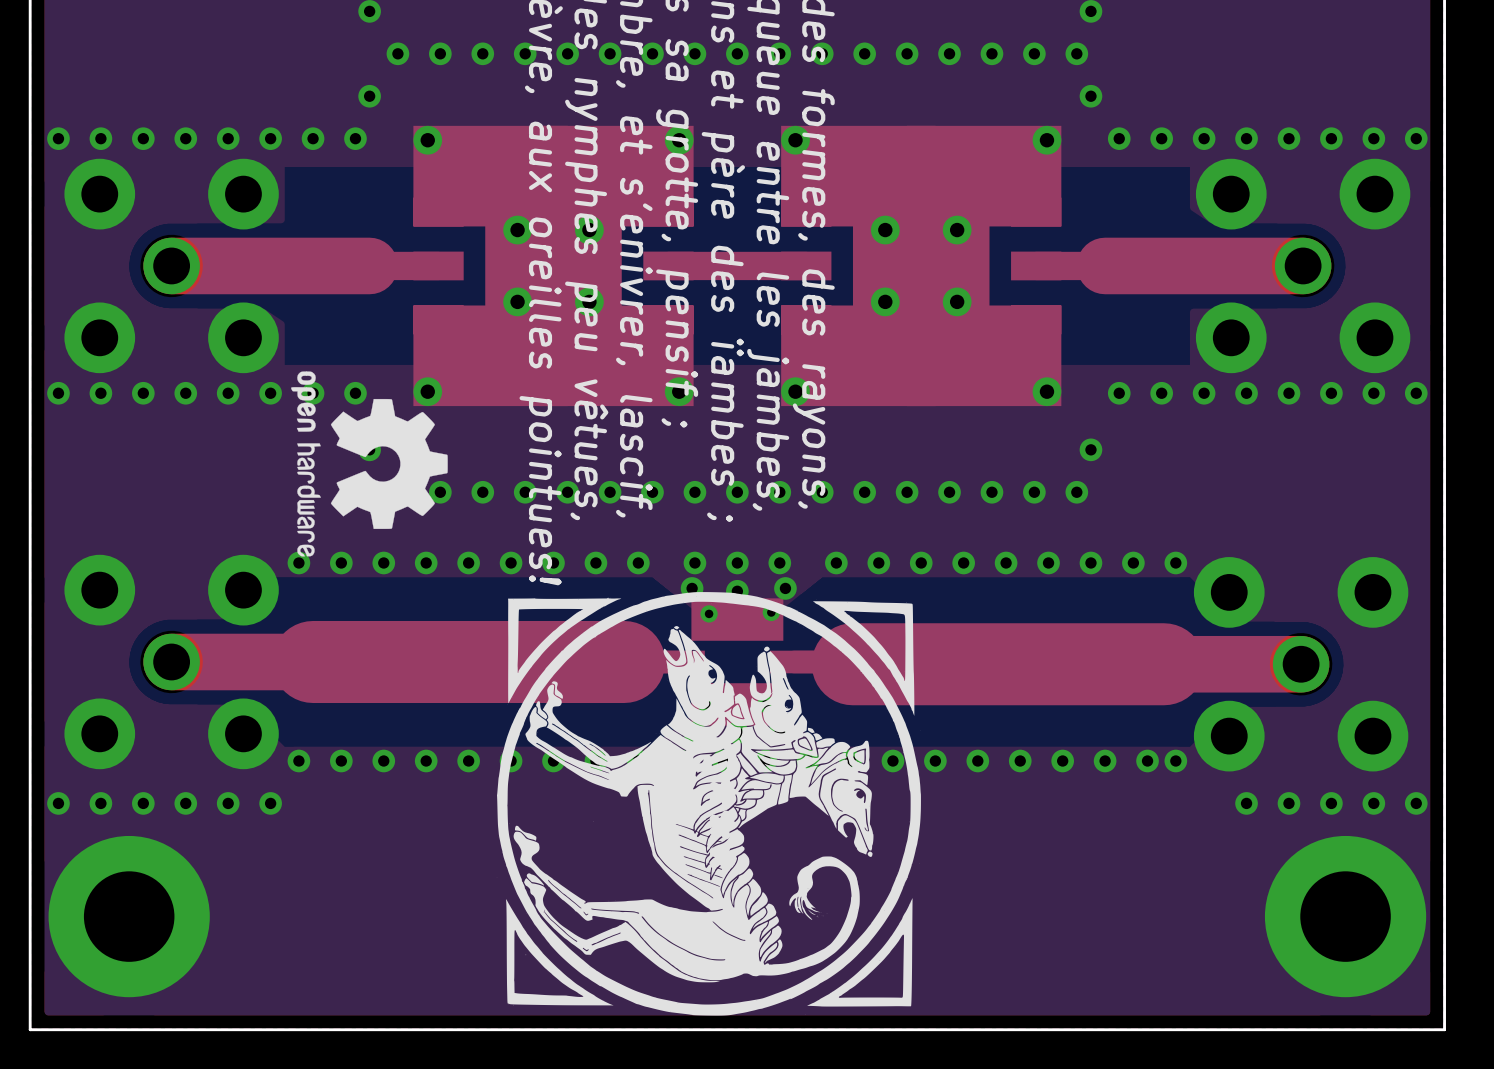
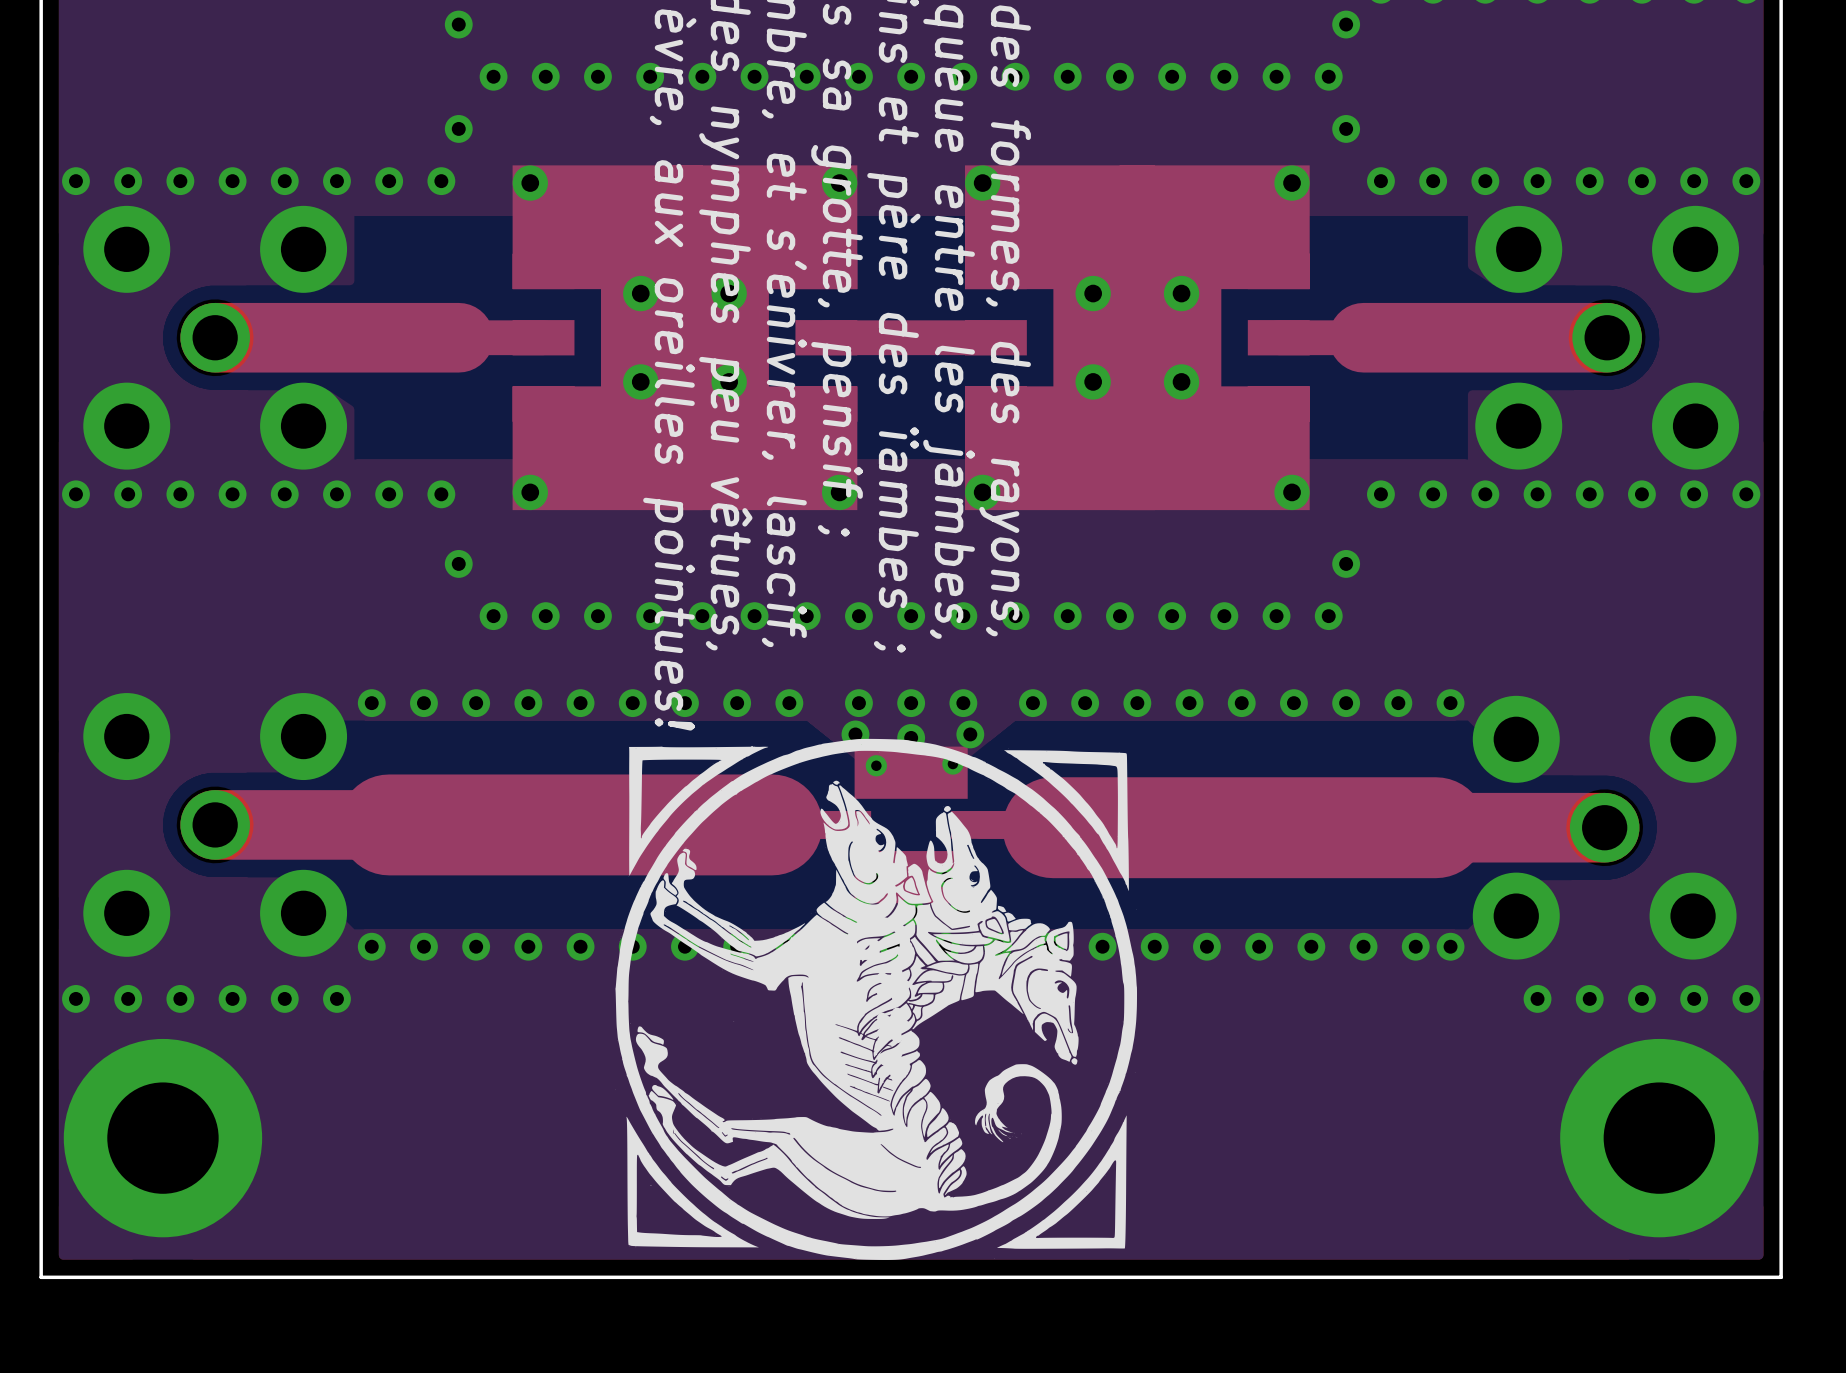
drawing: [291, 371, 448, 557] -> none

